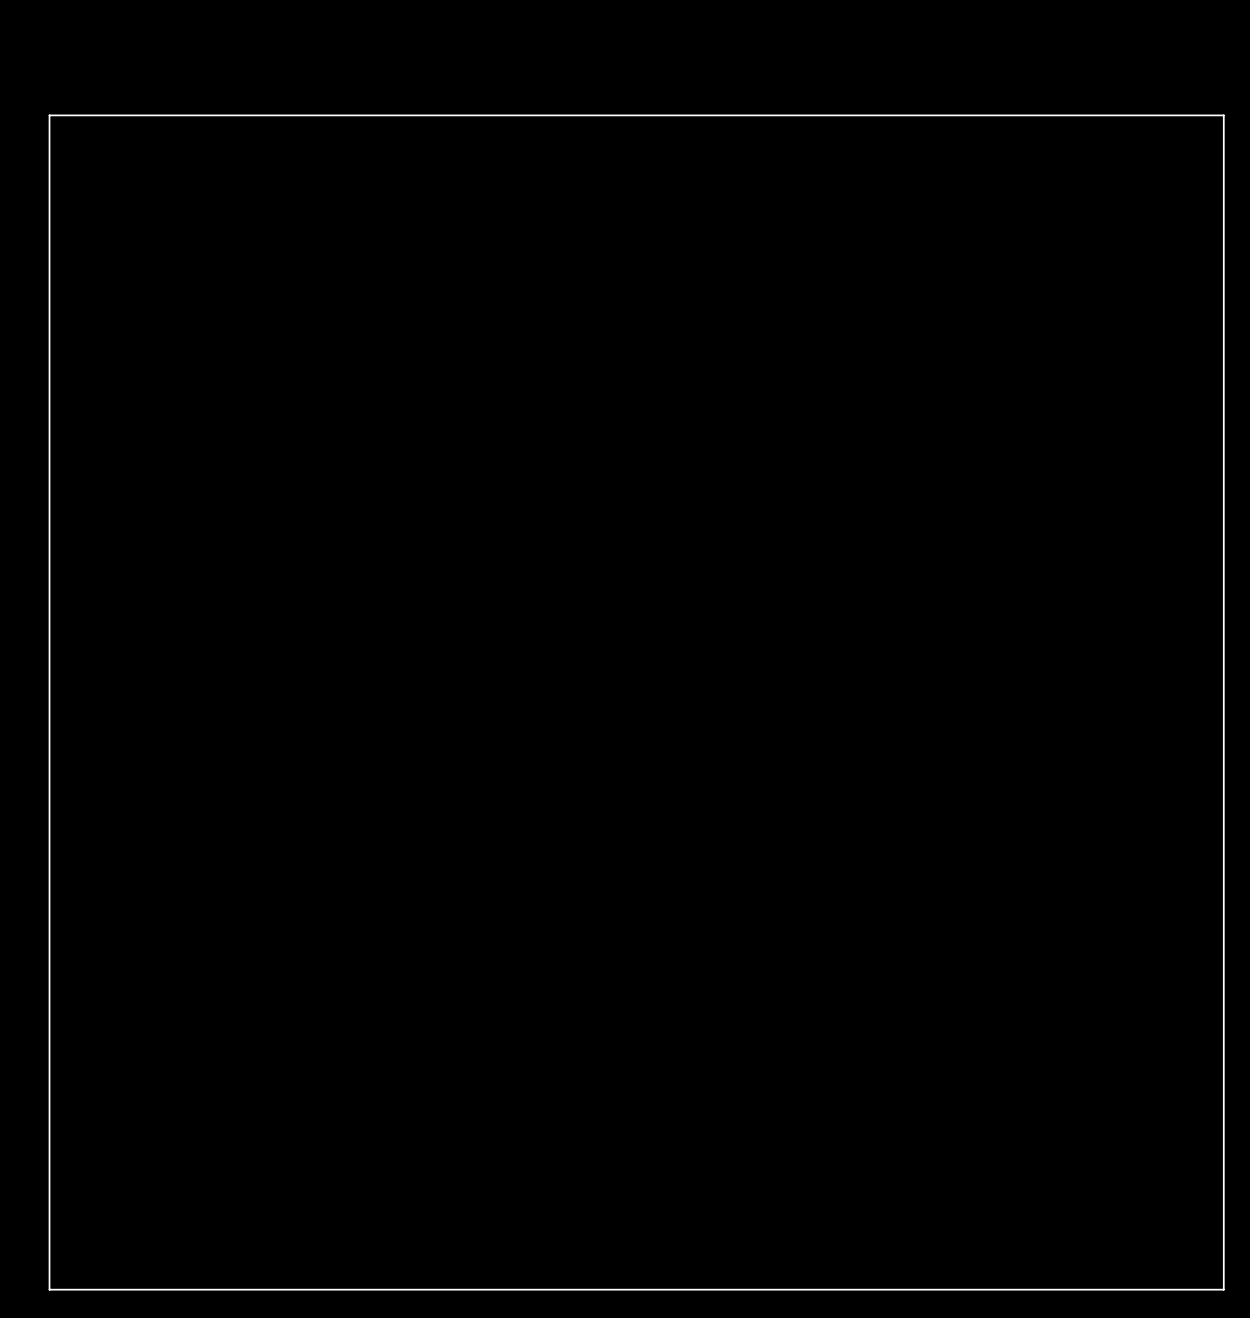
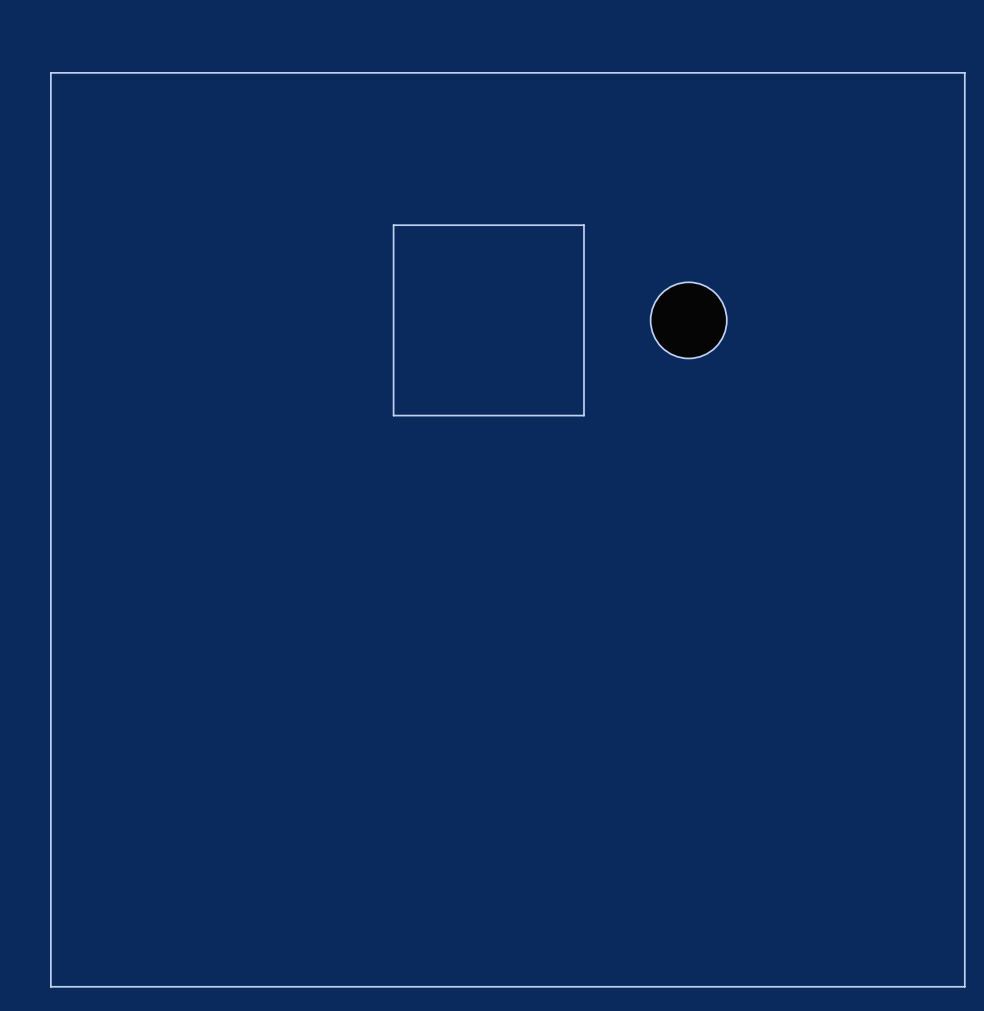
board edge: none -> (393, 225) (583, 225) (583, 415) (393, 415) (393, 225)
hole: none -> (688, 320)

